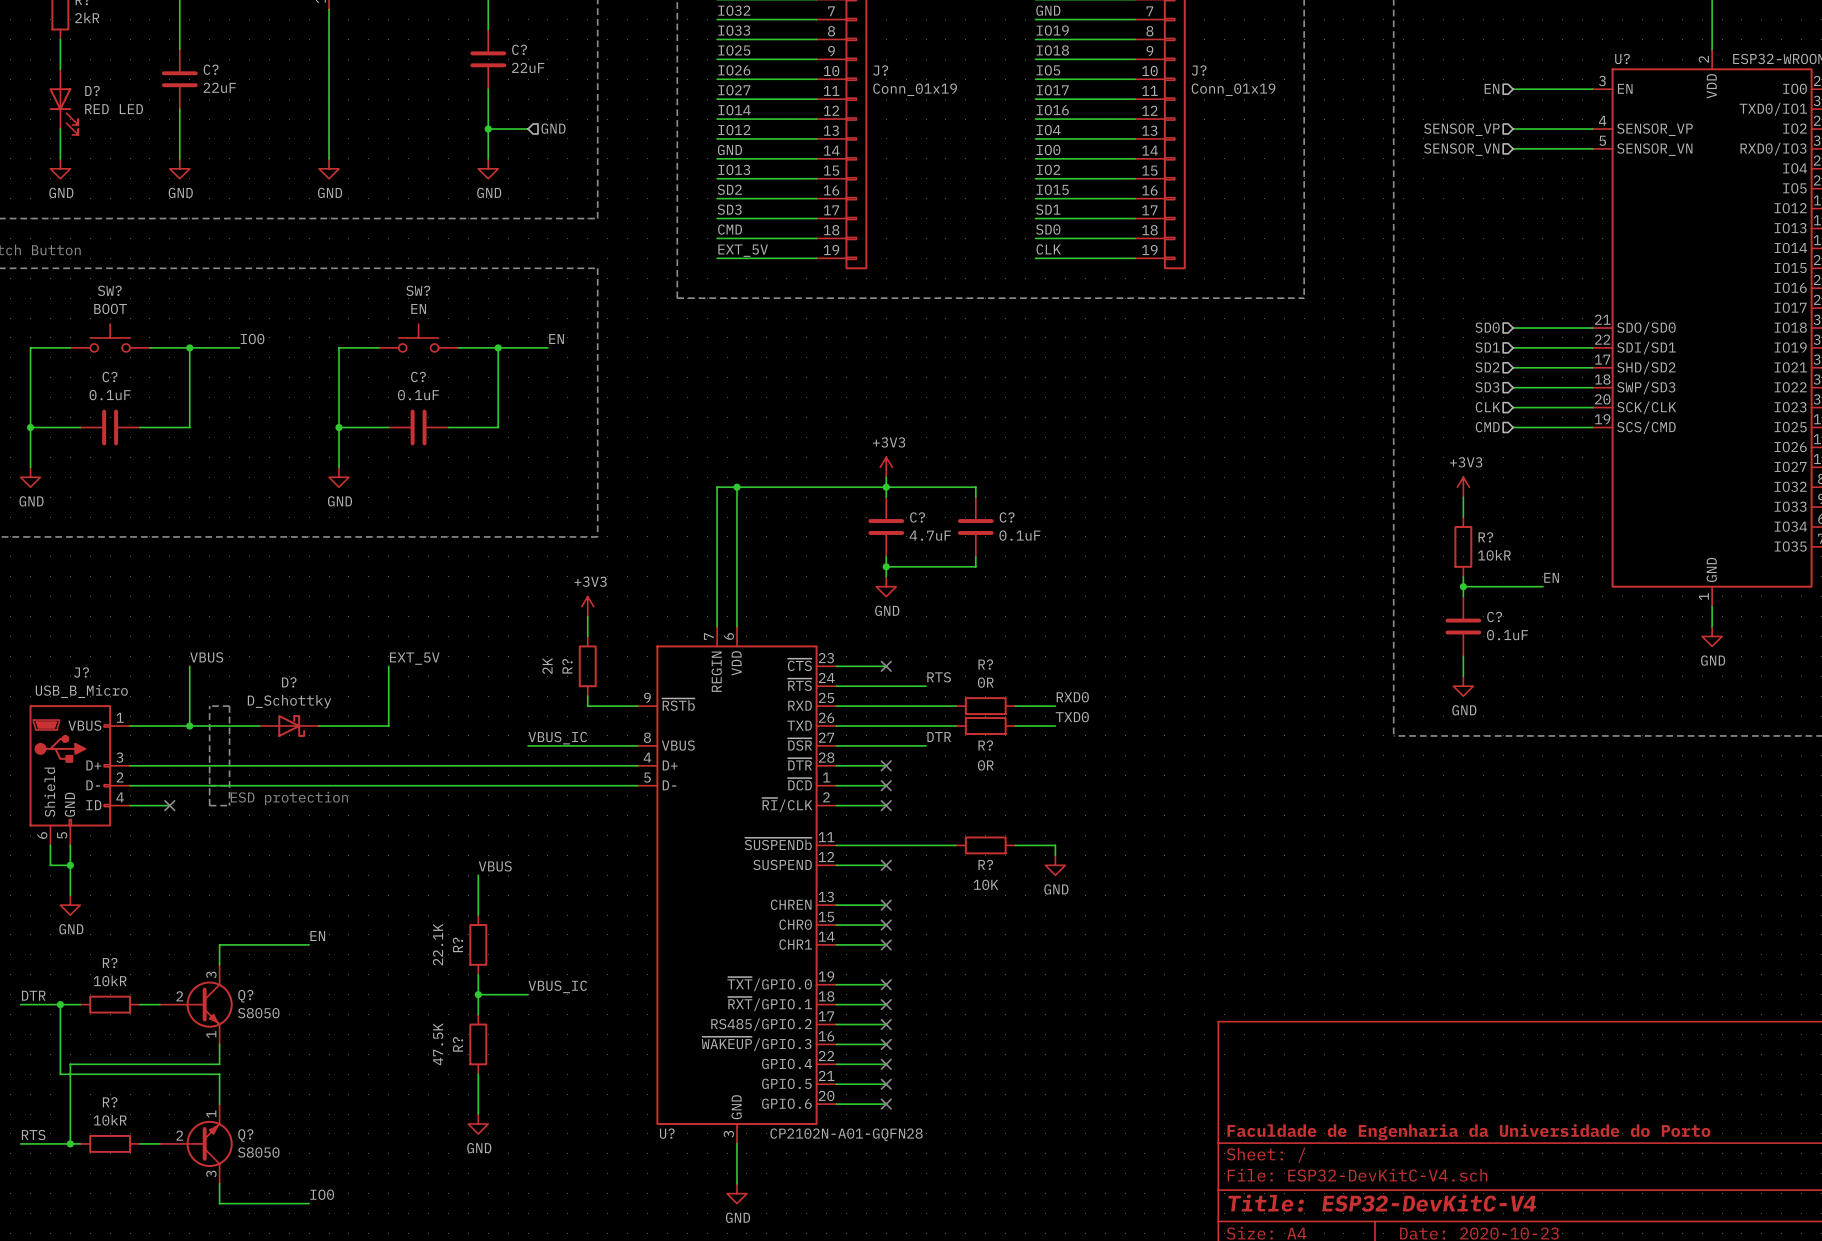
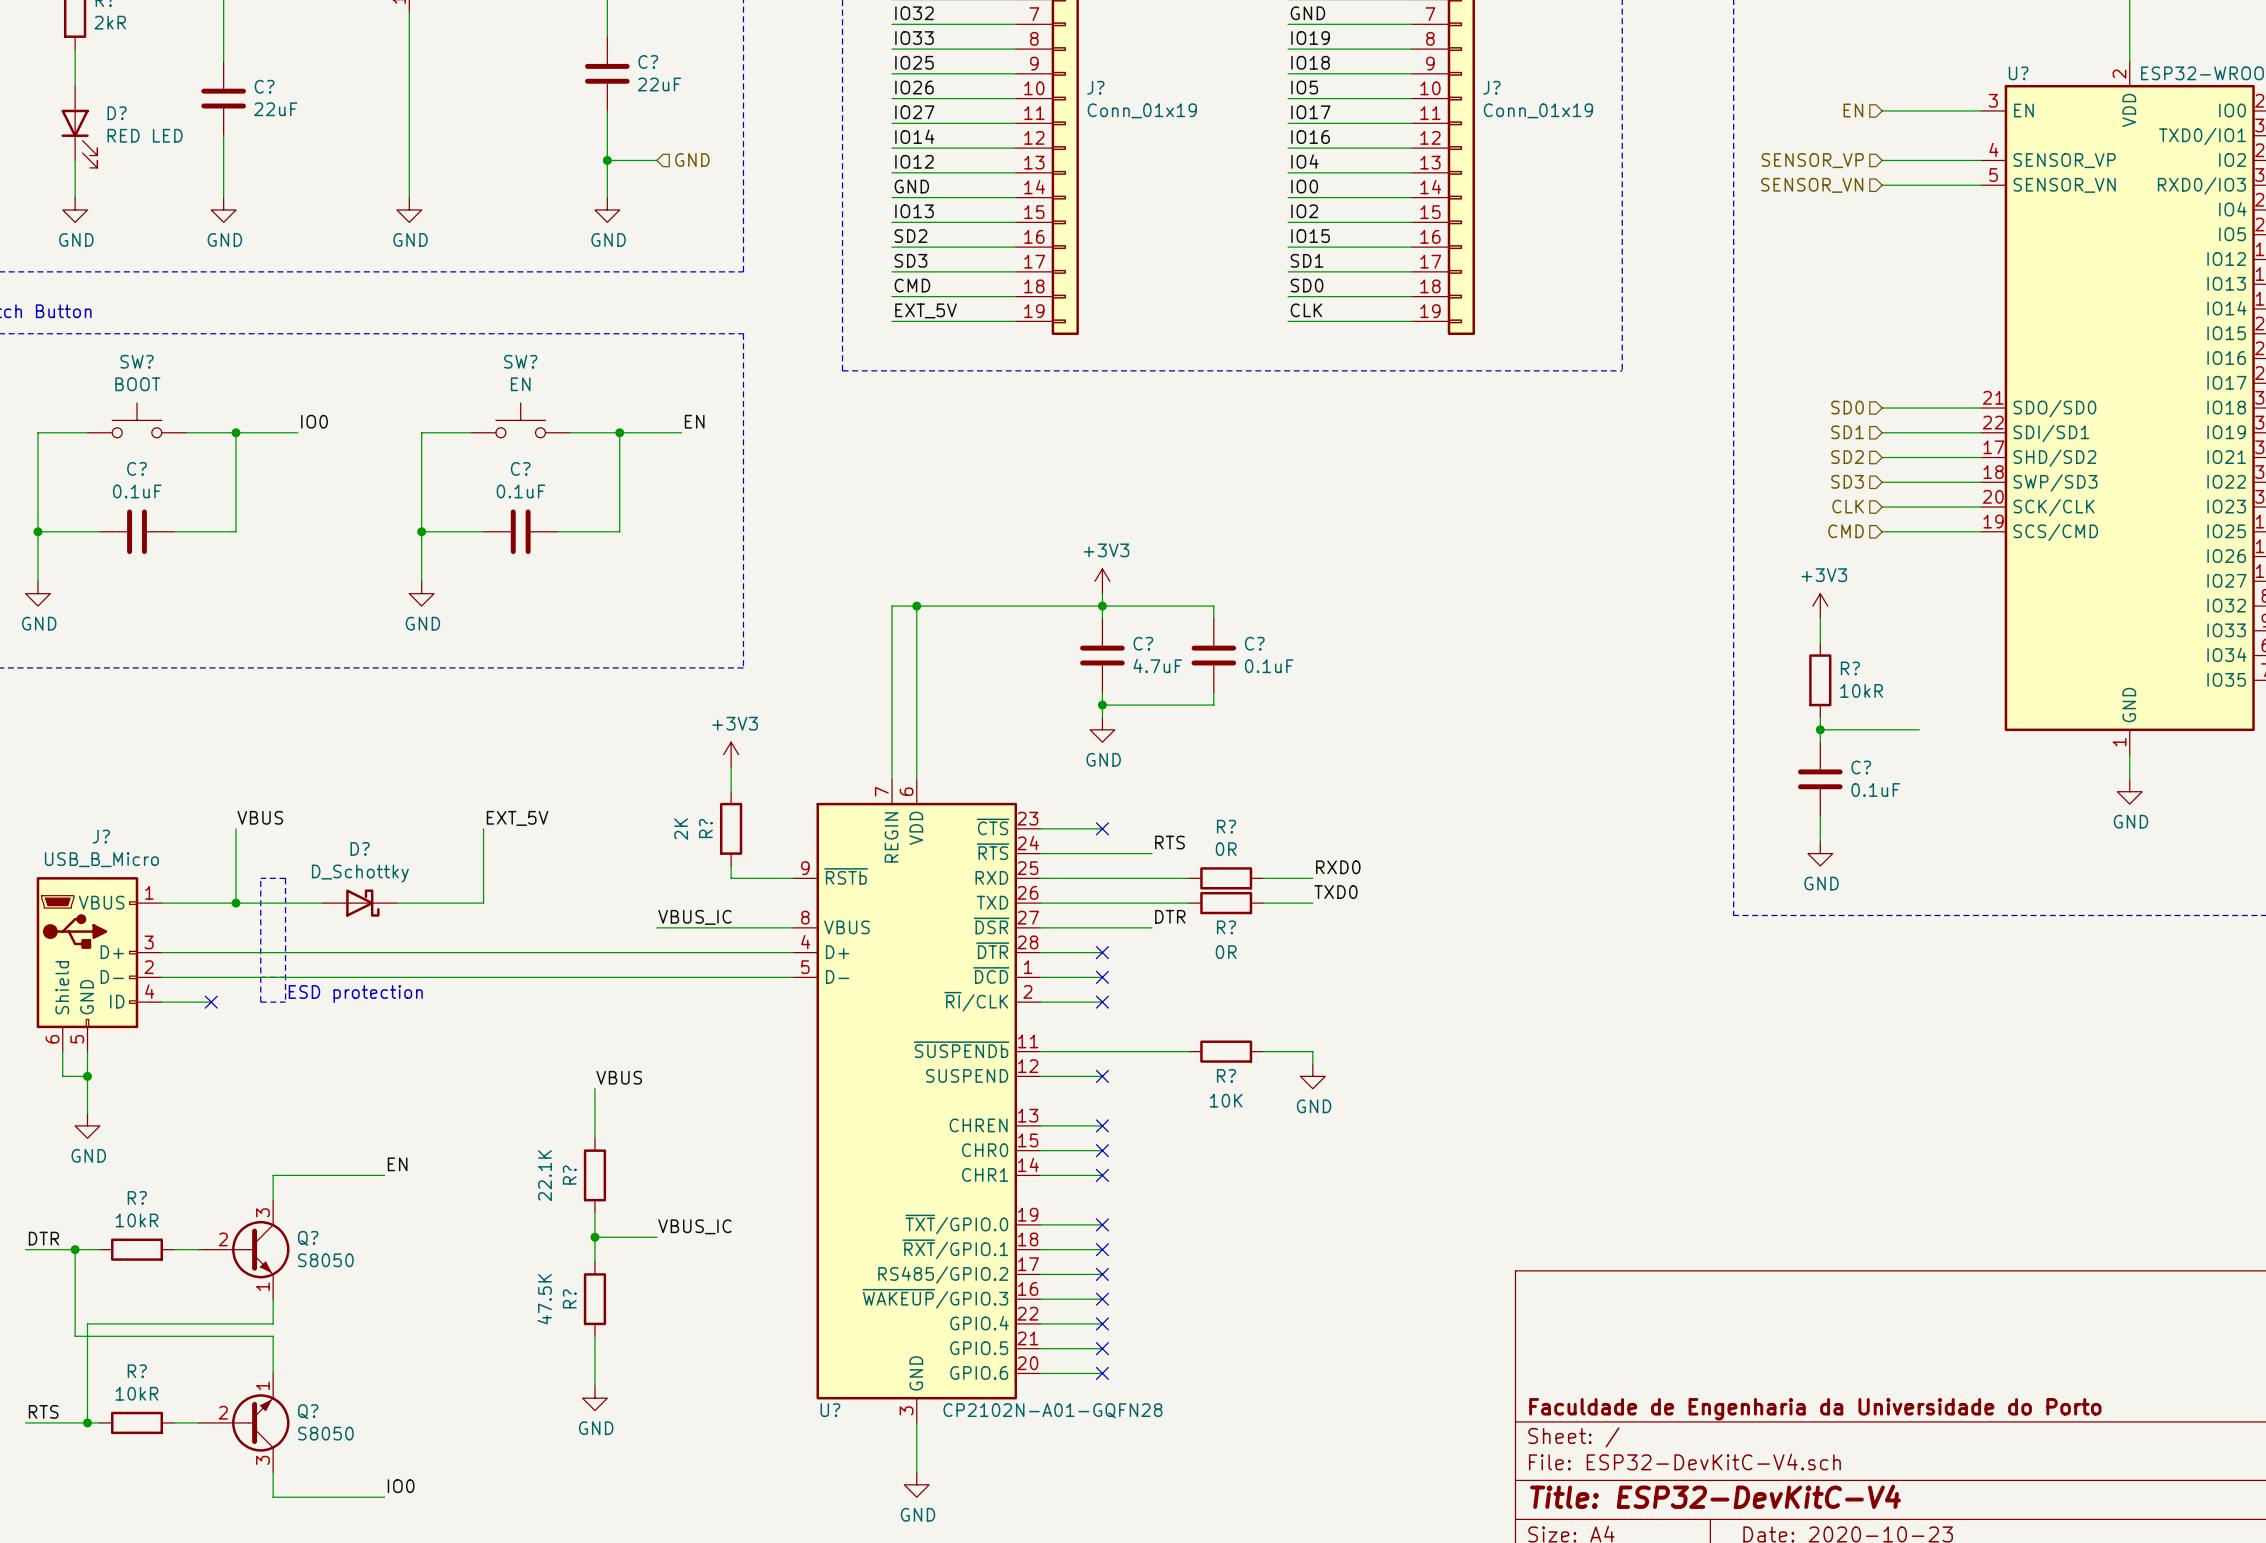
label: EN (1551, 577) -> none

